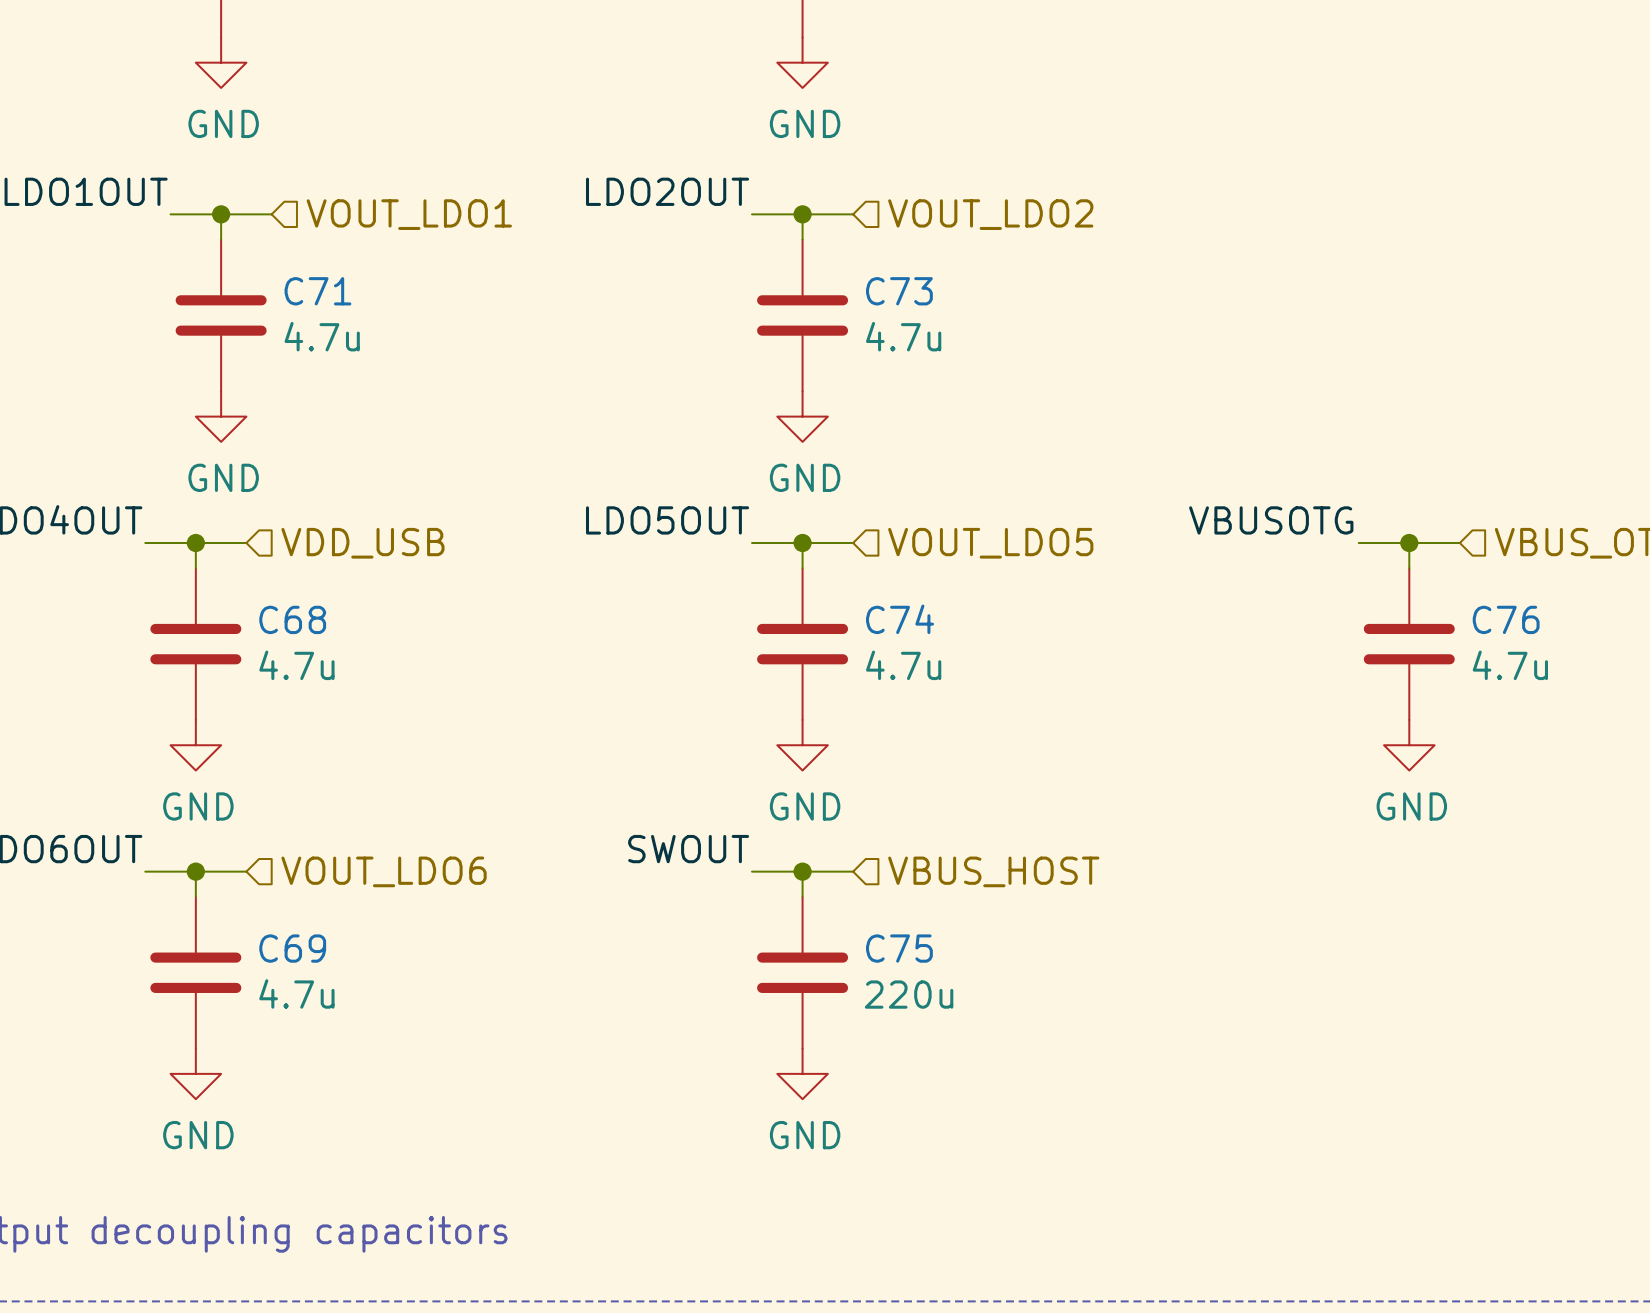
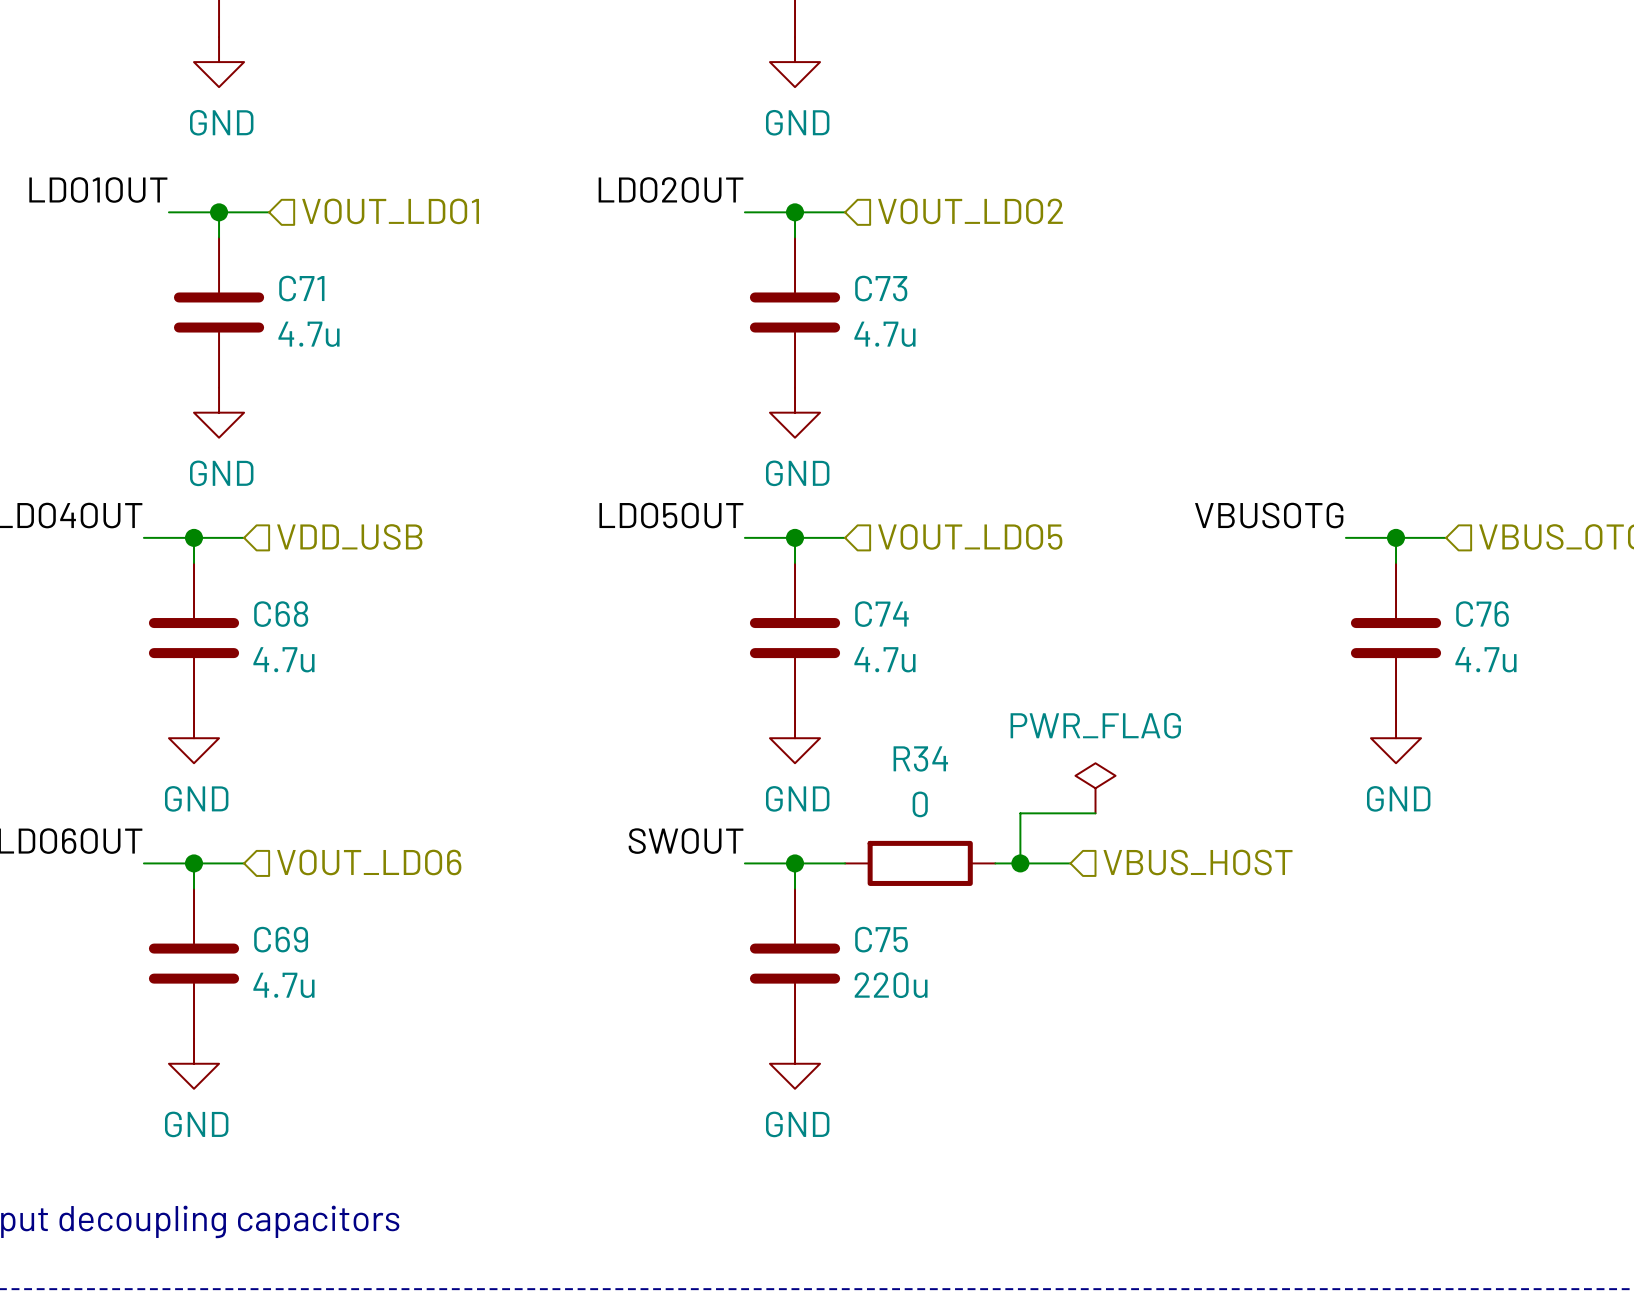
power symbol: none -> PWR_FLAG (1095, 788)
wire: none -> (1095, 813) (1020, 813) (1020, 863)
R34: none -> 0 (920, 863)
hierarchical label position: VBUS_HOST (993, 871) -> VBUS_HOST (1198, 862)
wire: none -> (995, 863) (1070, 863)
junction: none -> (1020, 863)

